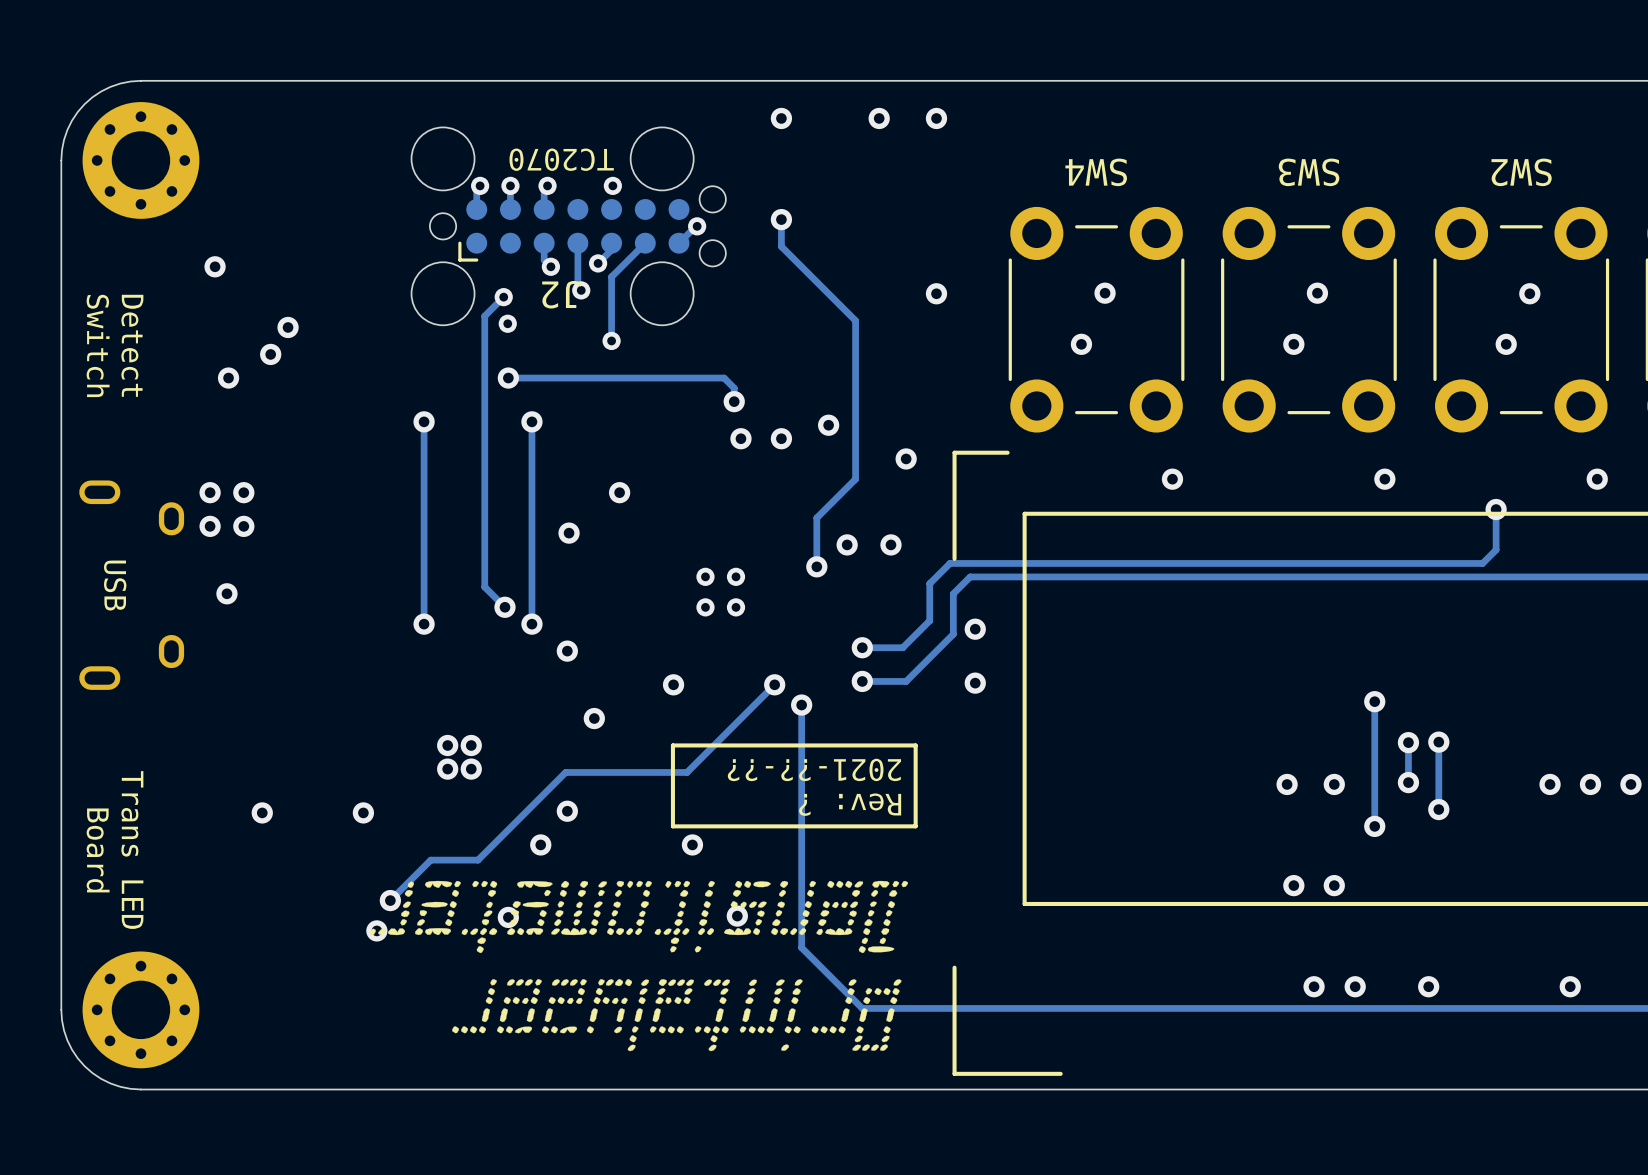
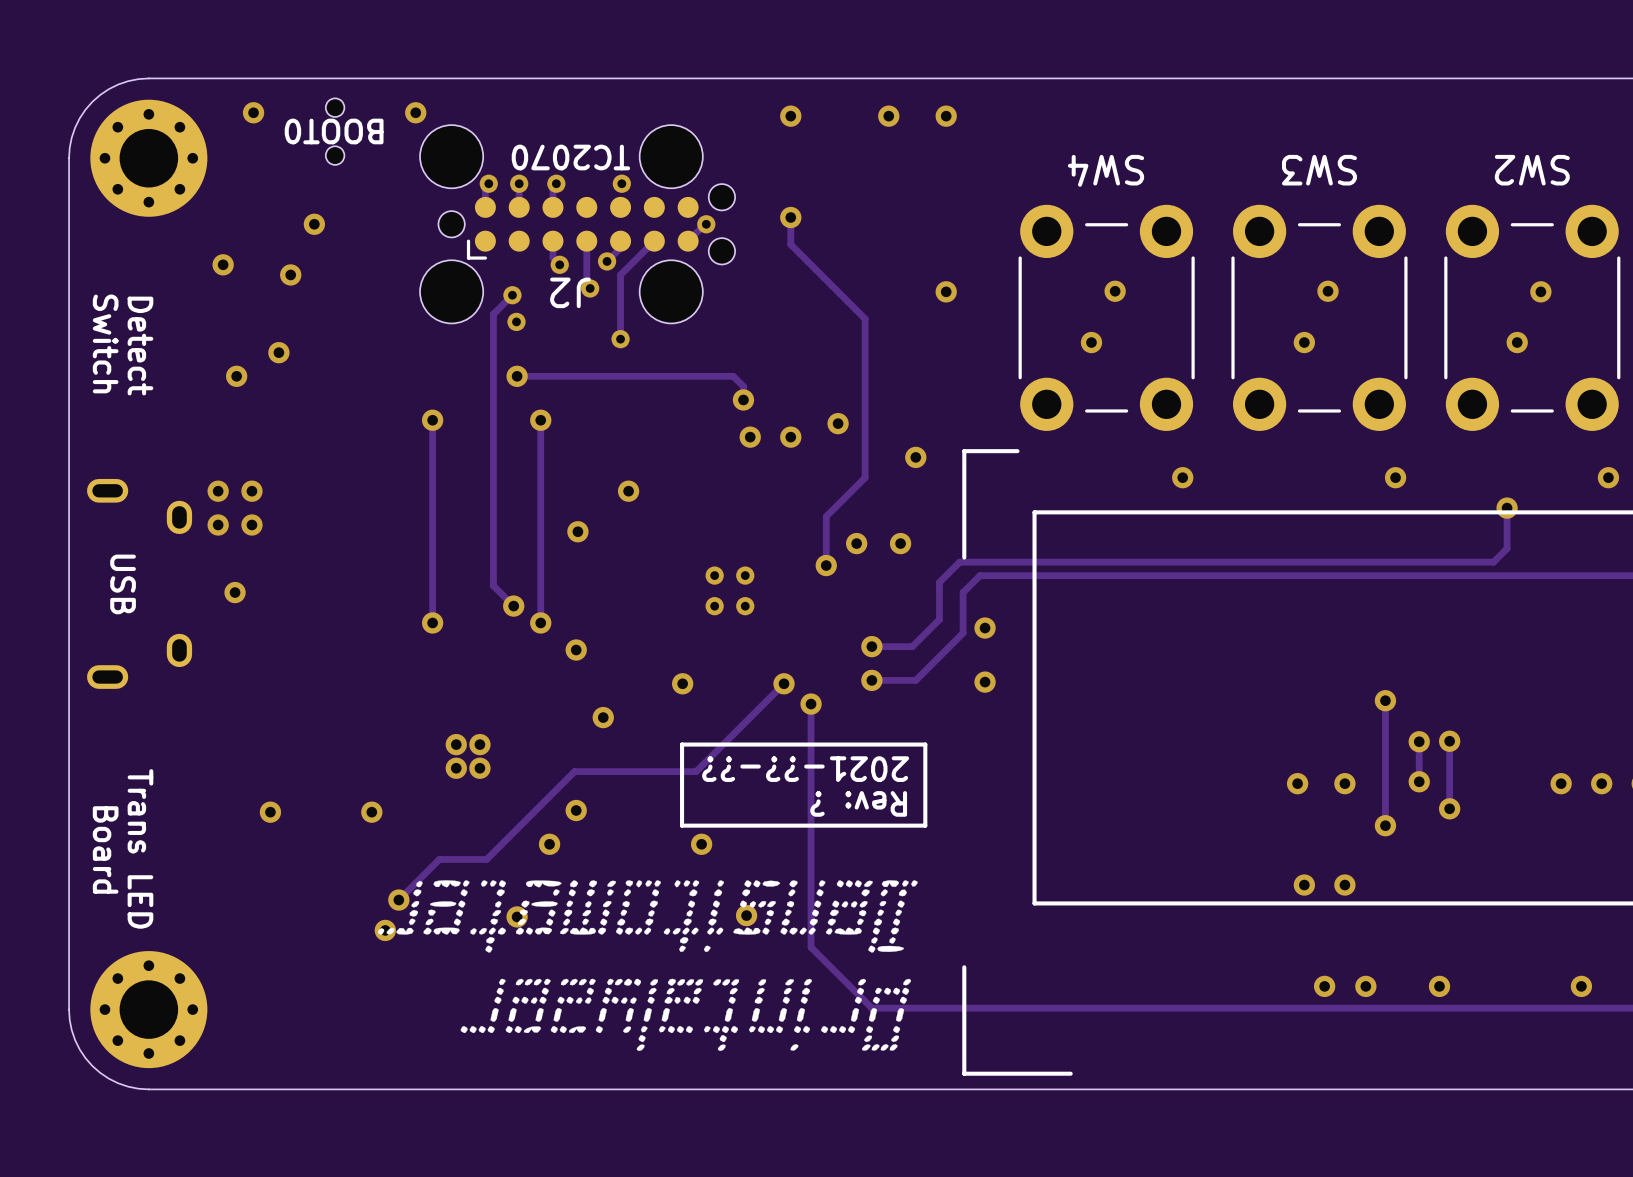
via: none -> (253, 112)
via: none -> (415, 112)
part: none -> (335, 131)
text: none -> BOOT0 (334, 131)
via: none -> (314, 224)
via position: (288, 327) -> (290, 274)

